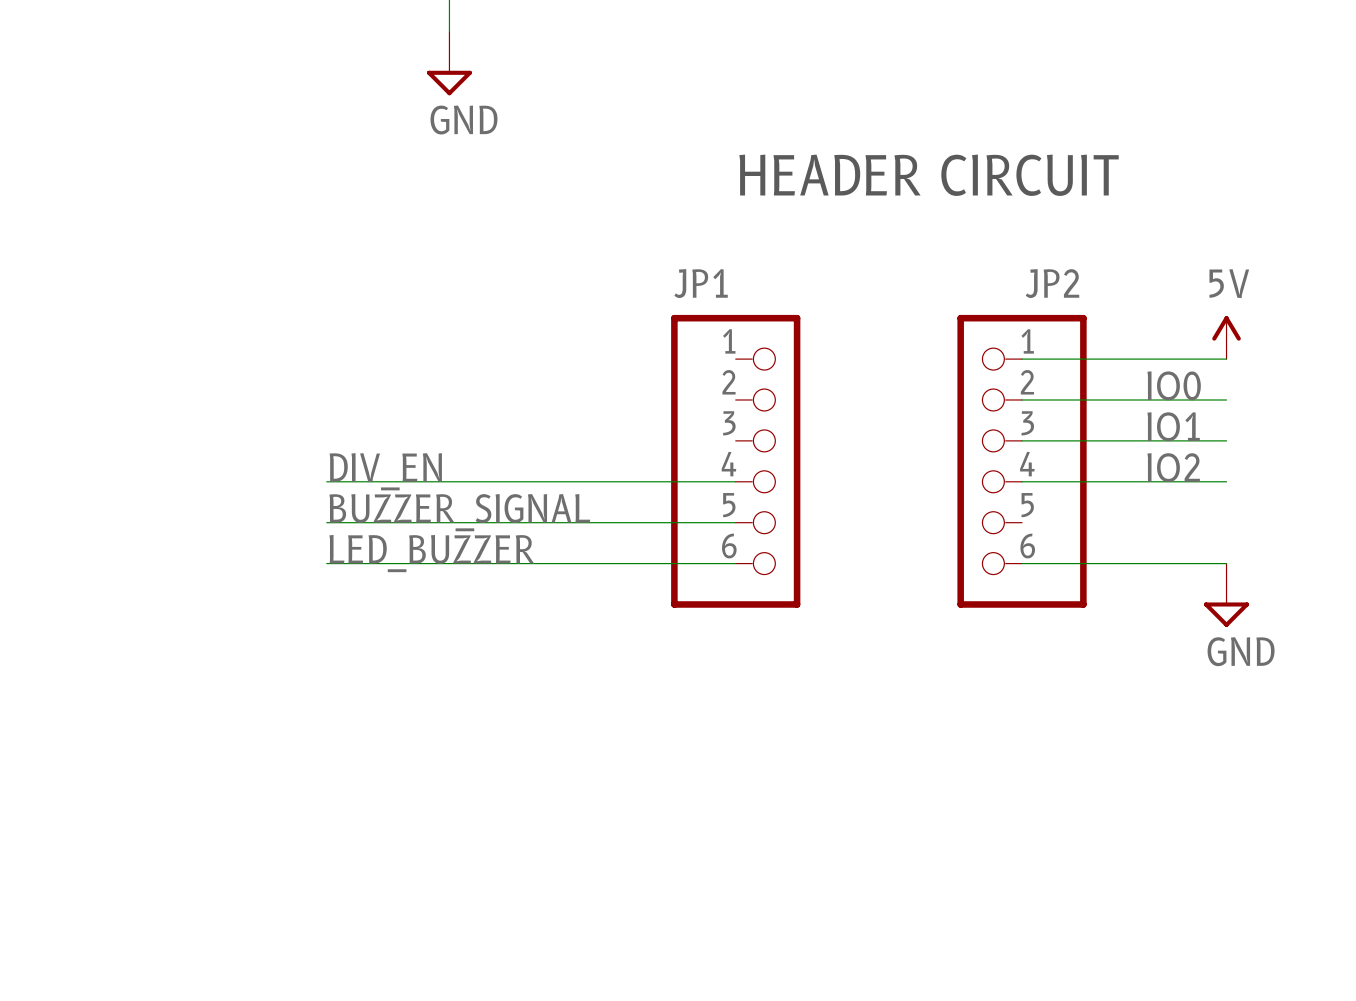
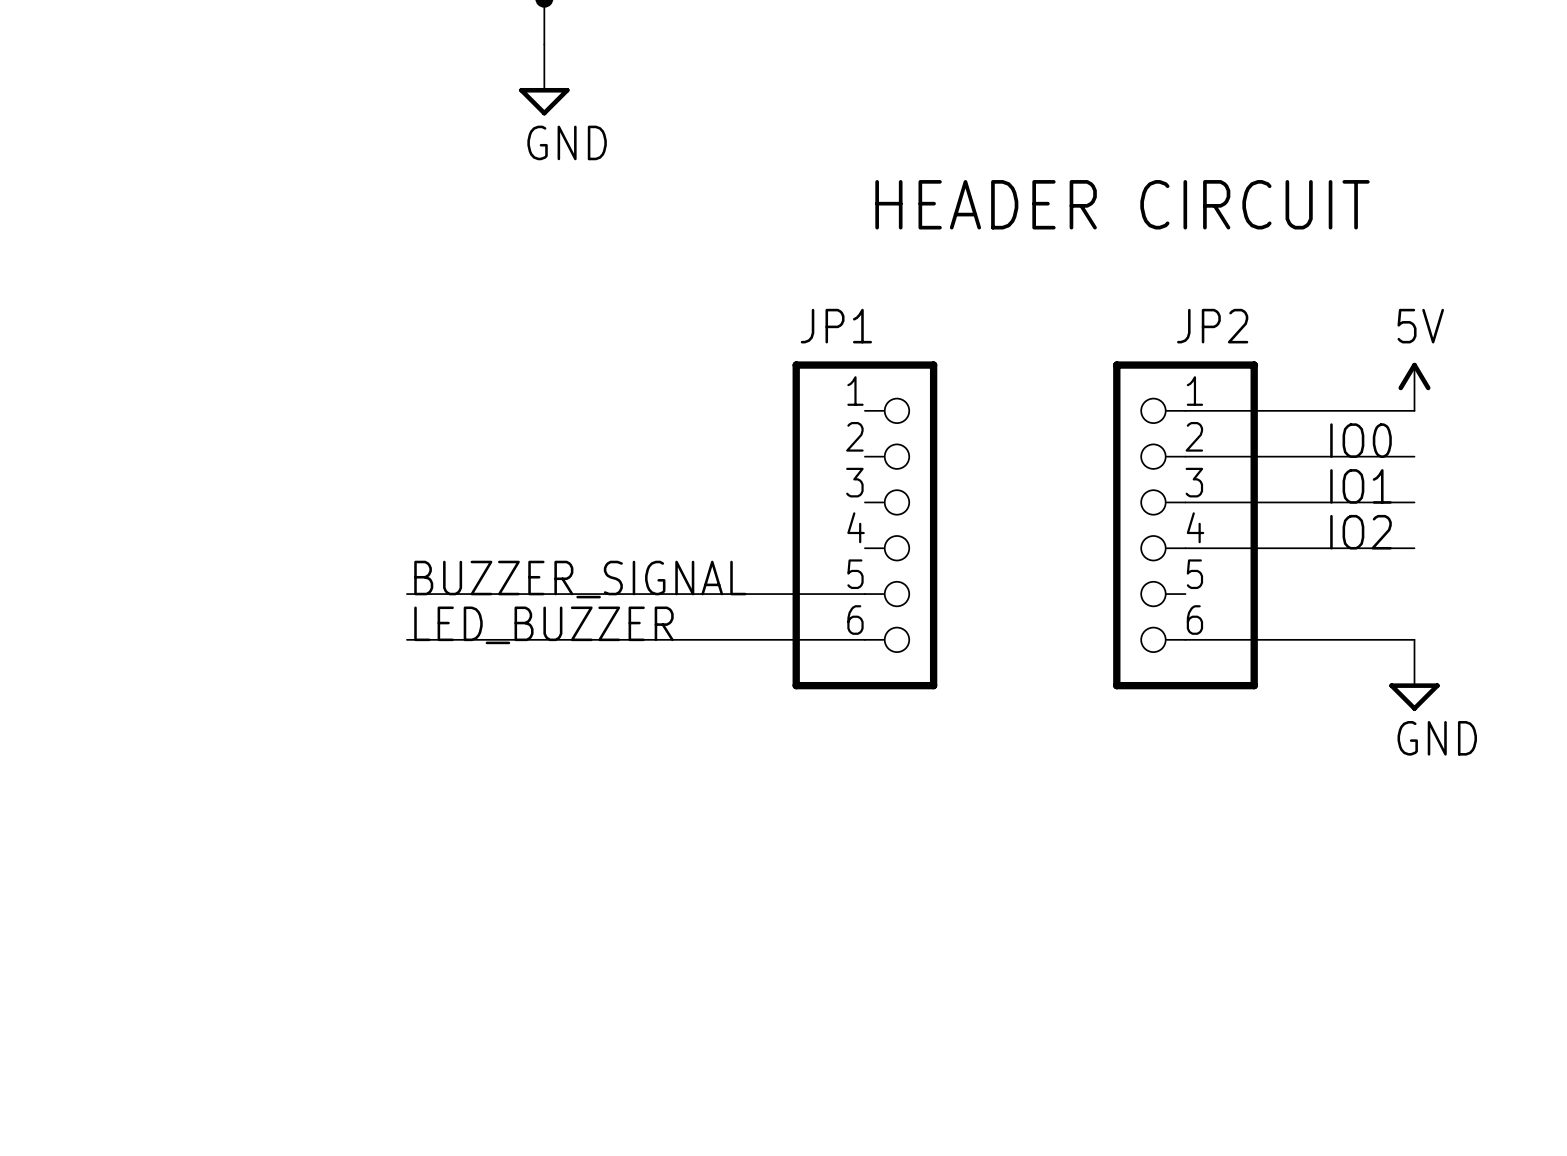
label: DIV_EN (385, 471) -> none
wire: (326, 481) (735, 481) -> none

